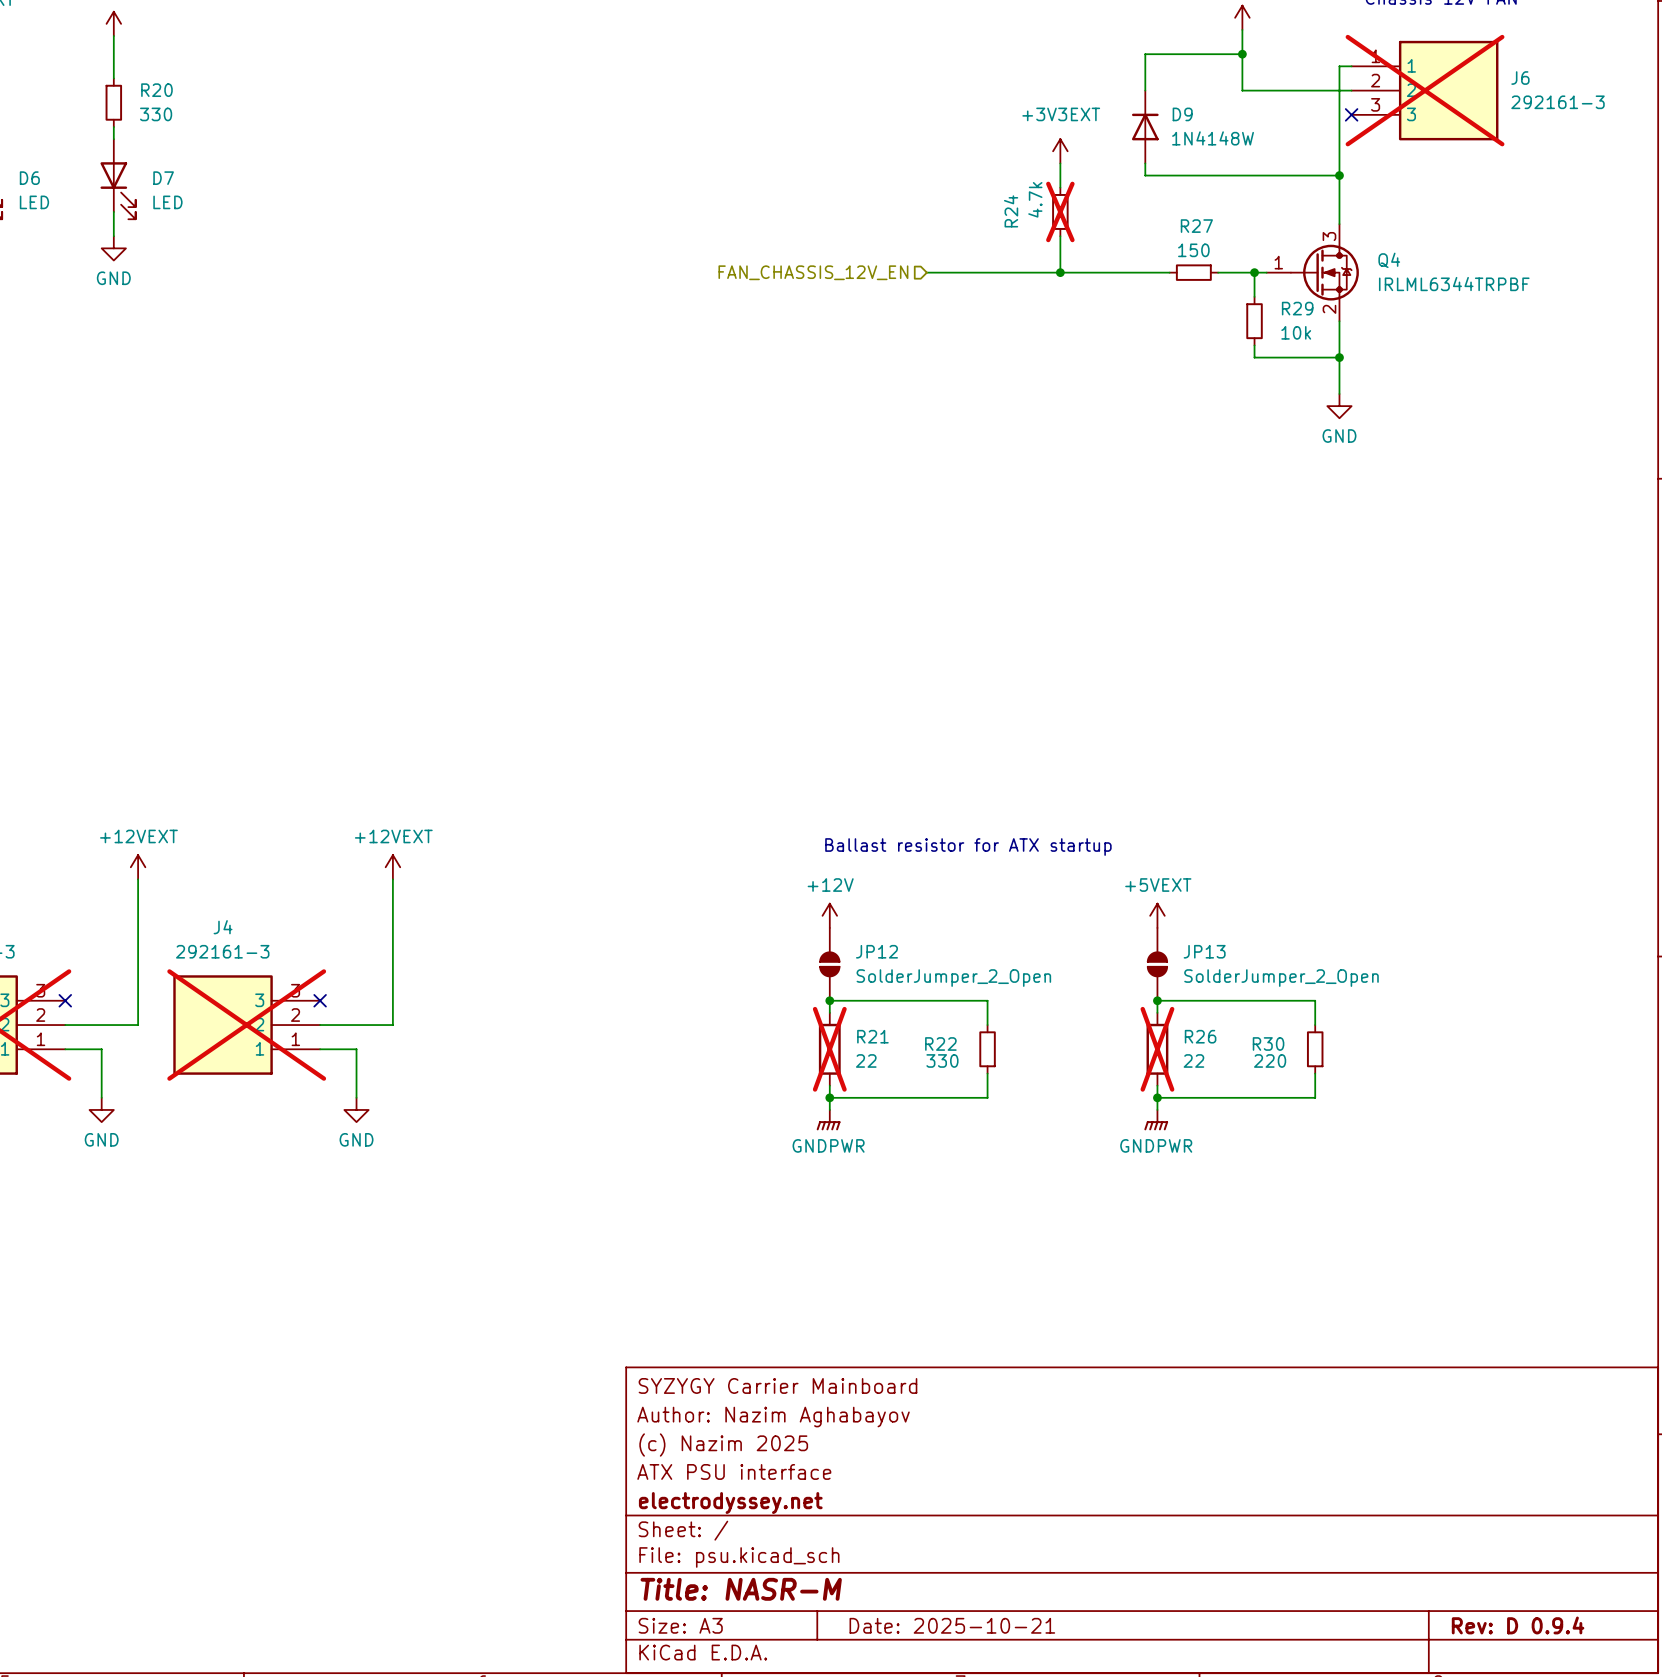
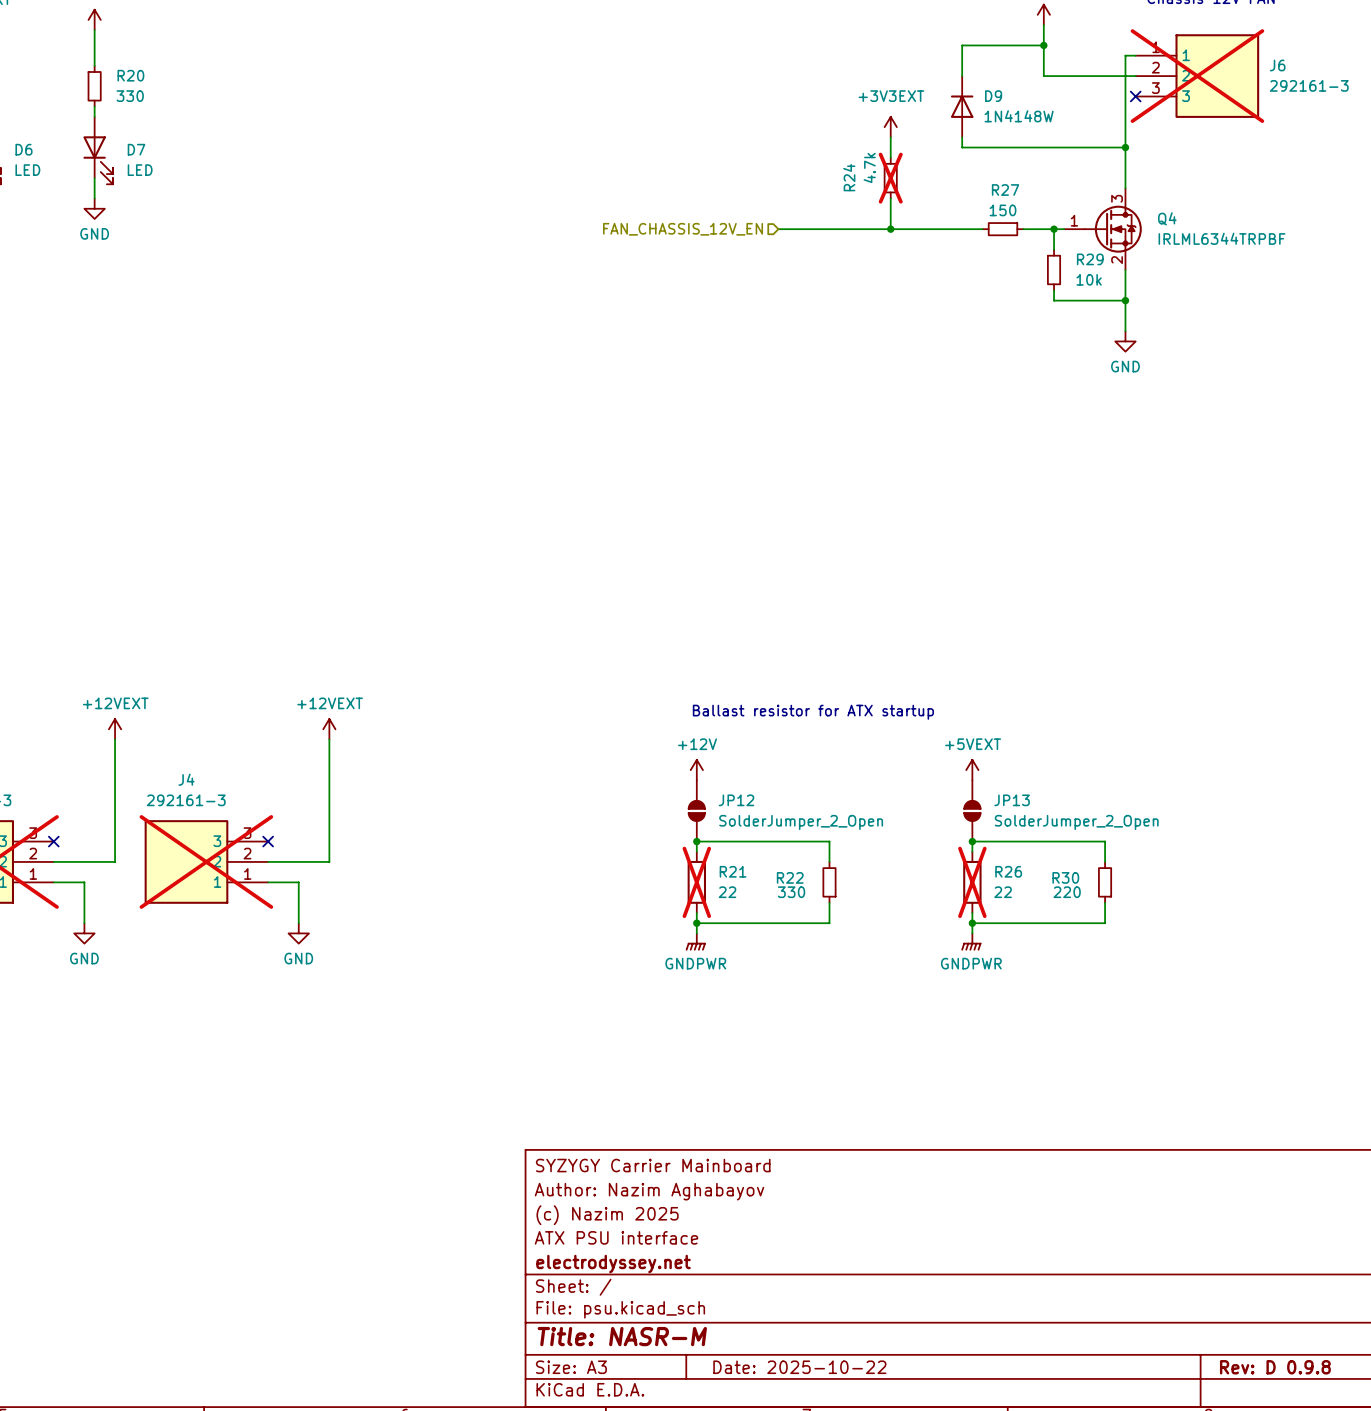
title block: Date: 2025-10-21 (952, 1625) -> Date: 2025-10-22 (799, 1367)
title block: Rev: D 0.9.4 (1518, 1625) -> Rev: D 0.9.8 (1275, 1367)

